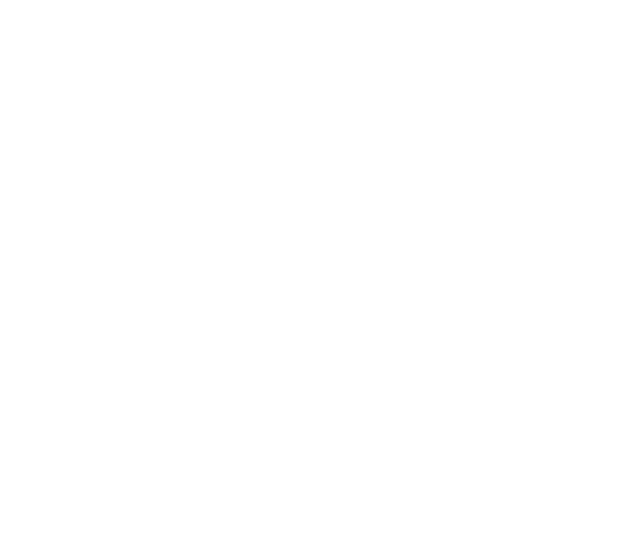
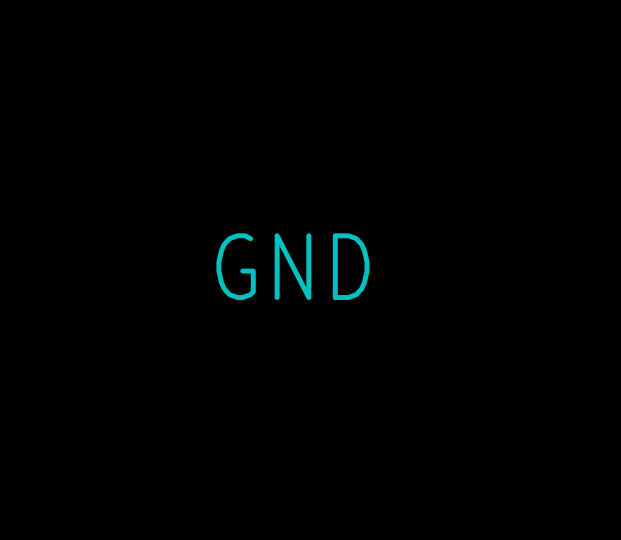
text: none -> GND (292, 266)

